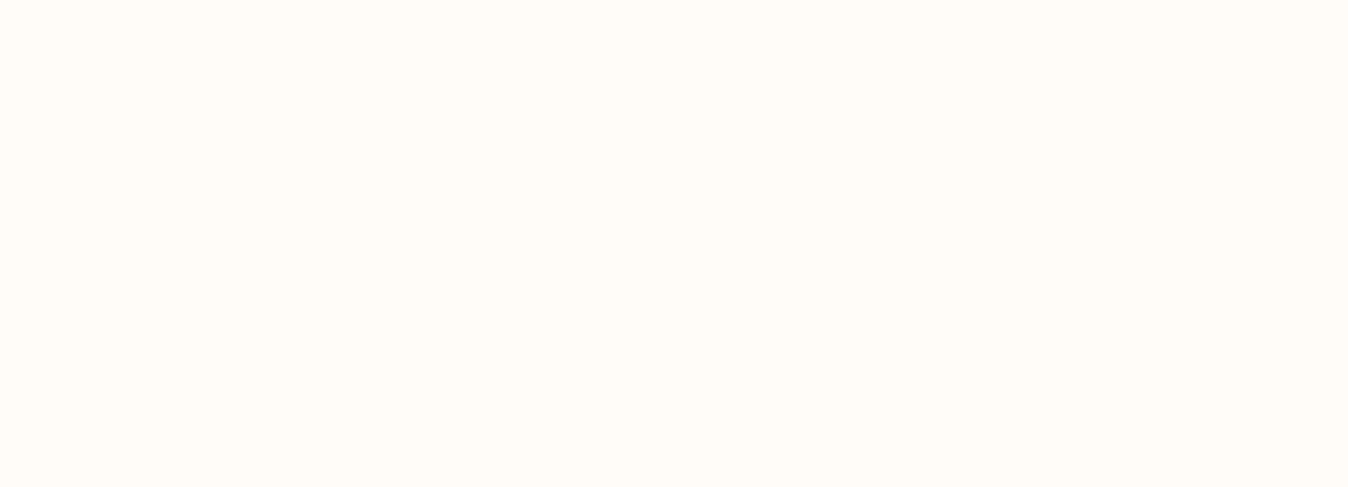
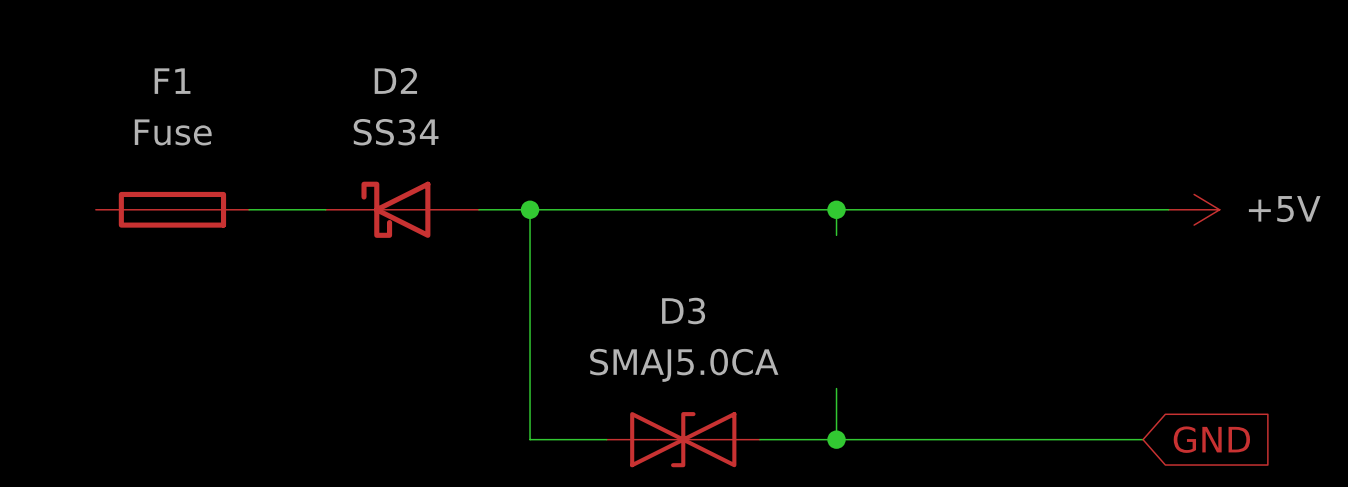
F1: none -> Fuse (172, 209)
wire: none -> (249, 209) (325, 209)
D2: none -> SS34 (402, 209)
wire: none -> (478, 209) (1168, 209)
wire: none -> (530, 209) (530, 439) (606, 439)
junction: none -> (530, 209)
wire: none -> (836, 209) (836, 235)
junction: none -> (836, 209)
power symbol: none -> +5V (1194, 209)
wire: none -> (836, 388) (836, 439)
D3: none -> SMAJ5.0CA (683, 439)
wire: none -> (759, 439) (1143, 439)
junction: none -> (836, 439)
global label: none -> GND (1211, 439)

